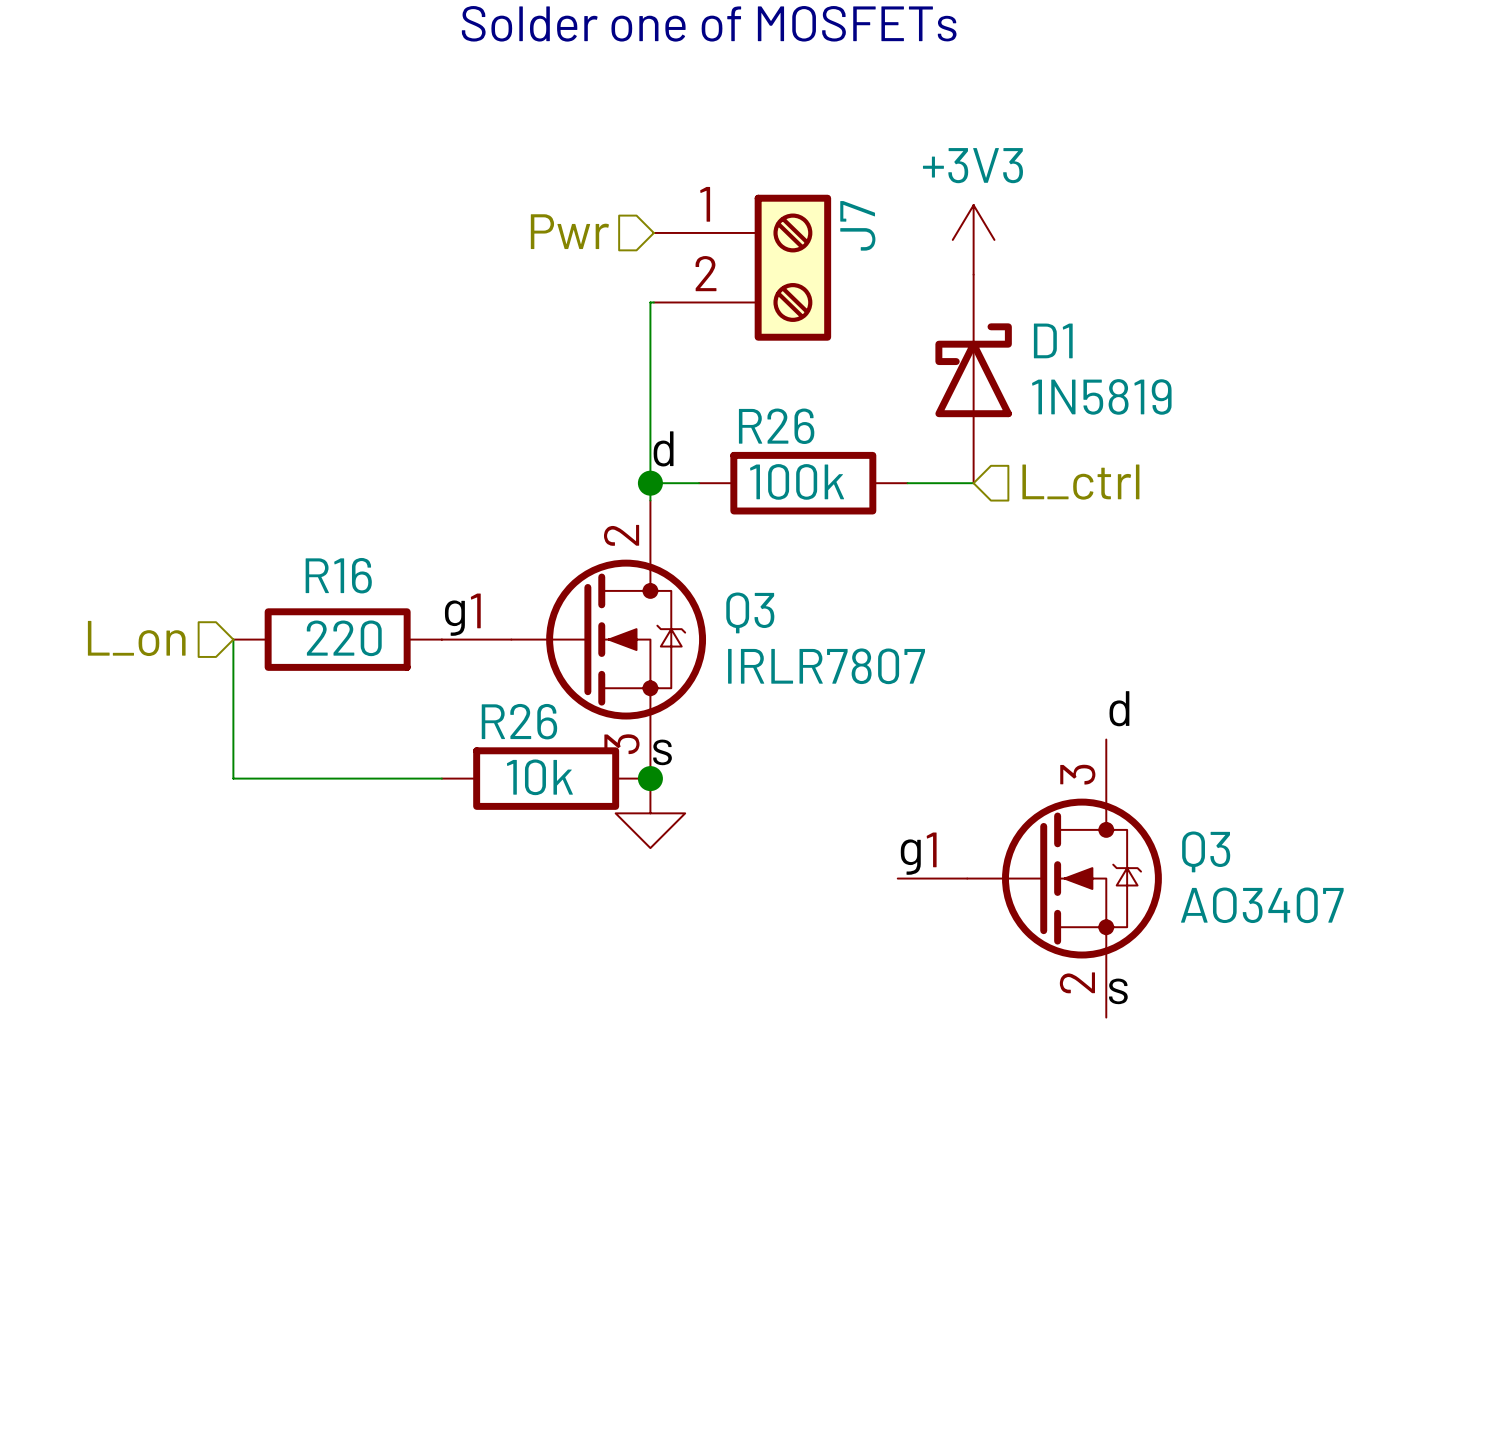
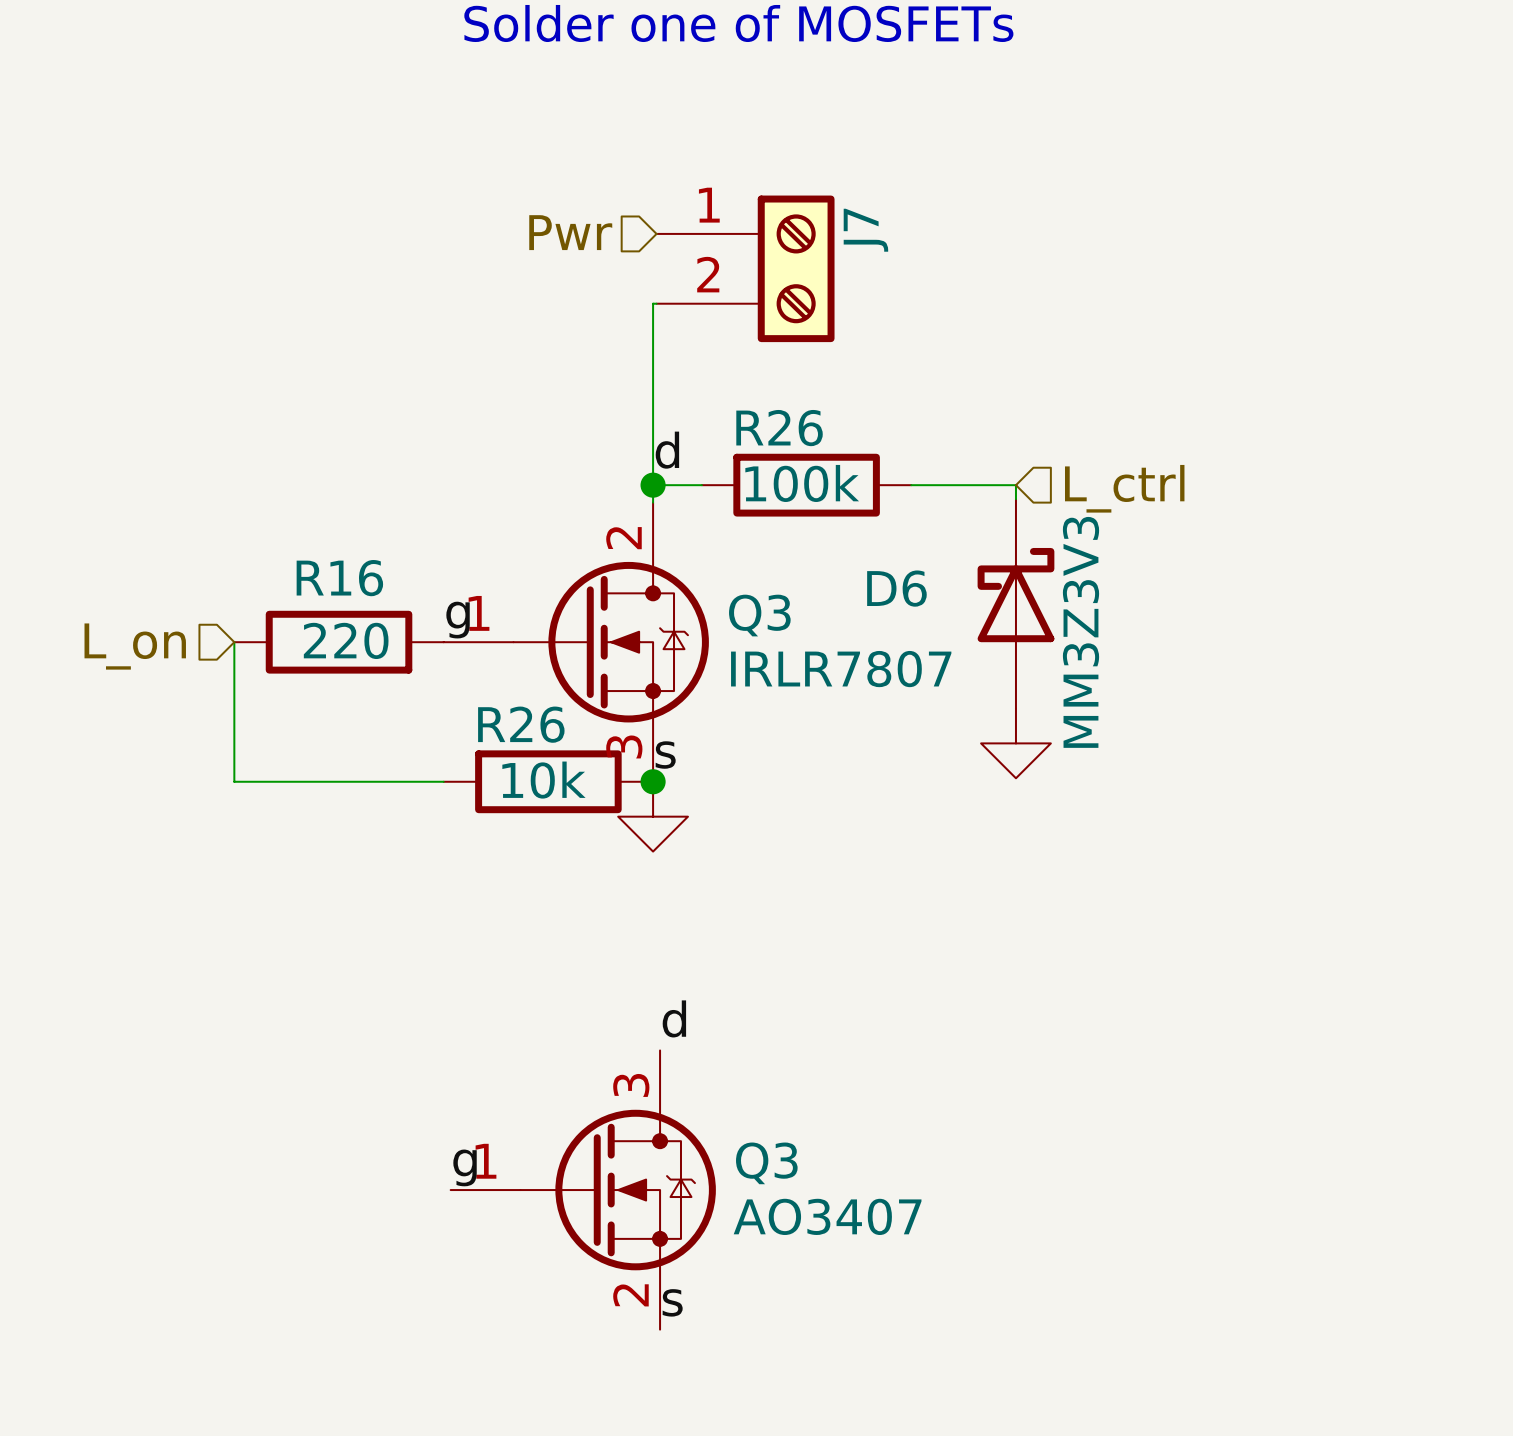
power symbol: +3V3 (973, 239) -> none
D1: 1N5819 (973, 378) -> none
hierarchical label position: L_ctrl (1080, 482) -> L_ctrl (1124, 488)
wire: none -> (977, 485) (1015, 485) (1015, 499)
D6: none -> MM3Z3V3 (1015, 603)
label position: d (1119, 708) -> d (674, 1018)
power symbol: none -> (1015, 743)
label position: g (910, 857) -> g (465, 1167)
Q3 position: (1029, 878) -> (583, 1190)
label position: s (1118, 991) -> s (672, 1302)

